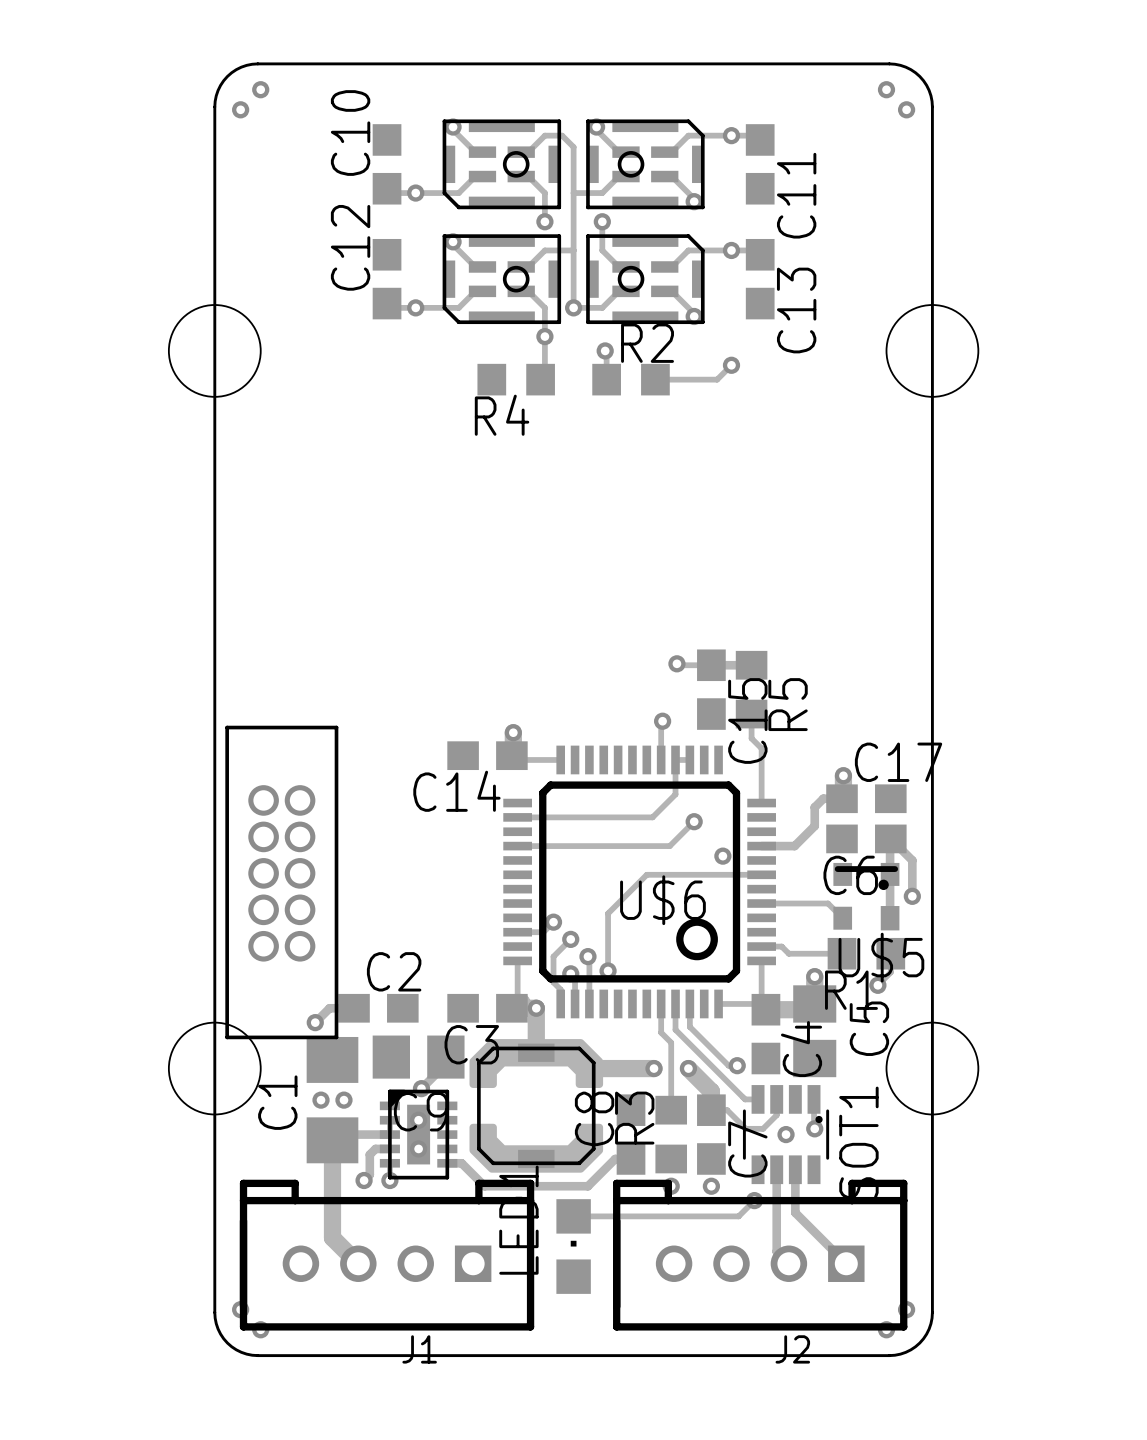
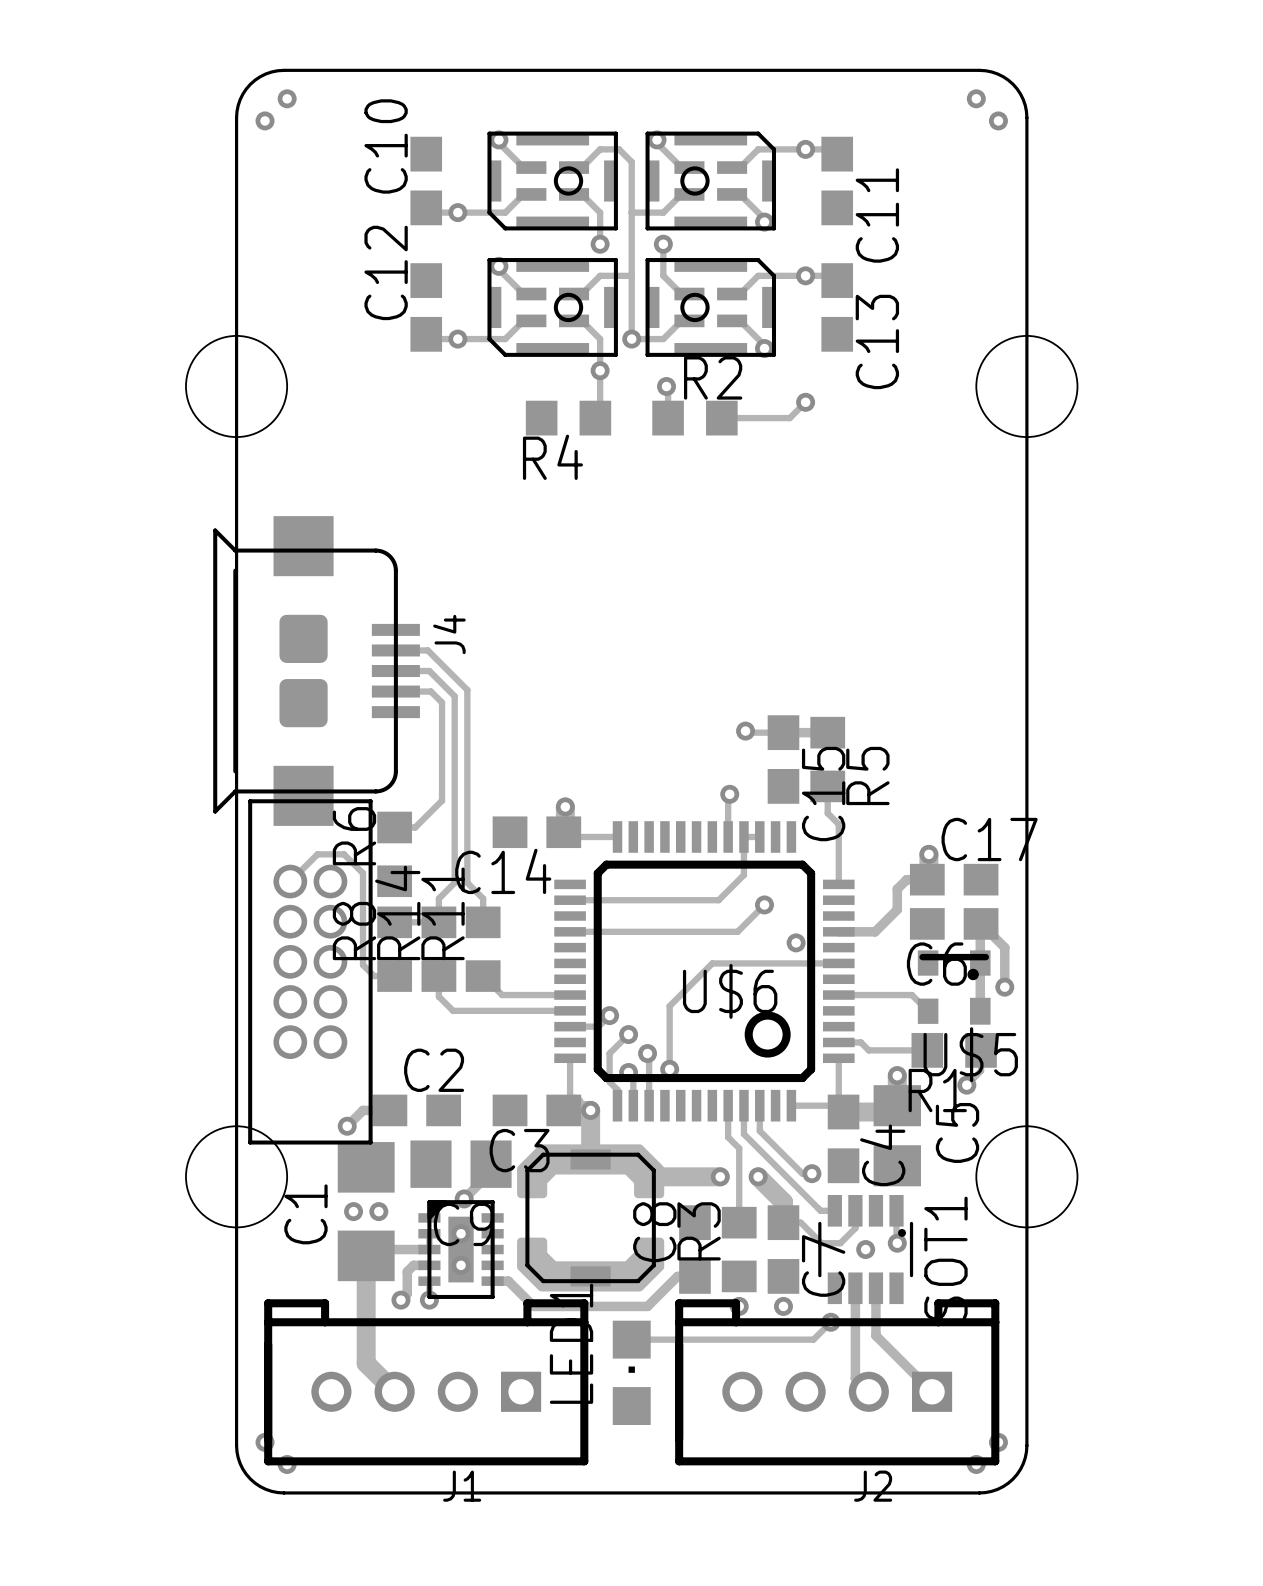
track: none -> (395, 650) (427, 650) (467, 689) (467, 882) (483, 898) (483, 922)
J4: none -> (316, 671)
track: none -> (395, 671) (429, 671) (454, 696) (454, 882) (438, 898) (438, 922) (394, 922)
track: none -> (395, 691) (430, 691) (442, 702) (442, 800) (415, 827) (394, 827)
R6: none -> (394, 854)
track: none -> (290, 881) (317, 854) (344, 854) (363, 873) (363, 965) (374, 976) (394, 976)
R8: none -> (394, 949)
R14: none -> (438, 949)
R11: none -> (483, 949)
track: none -> (438, 976) (438, 996) (453, 1010) (570, 1010)
track: none -> (483, 976) (502, 995) (570, 995)

